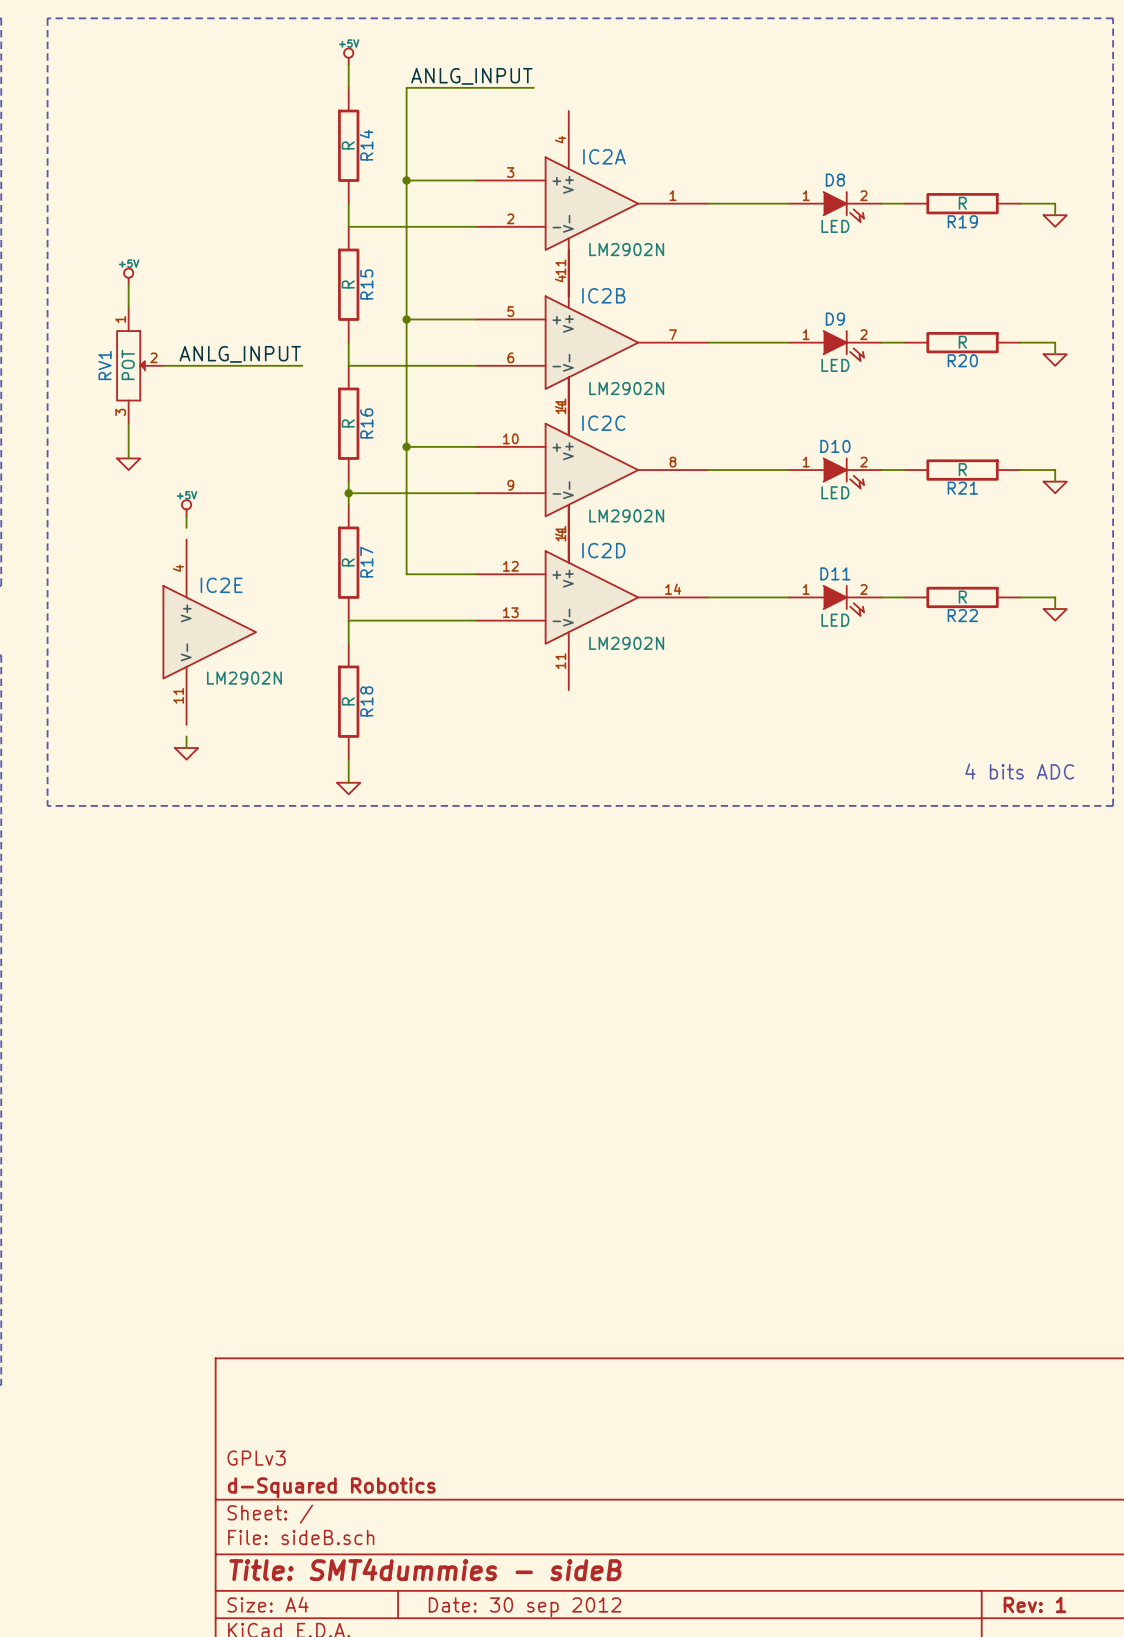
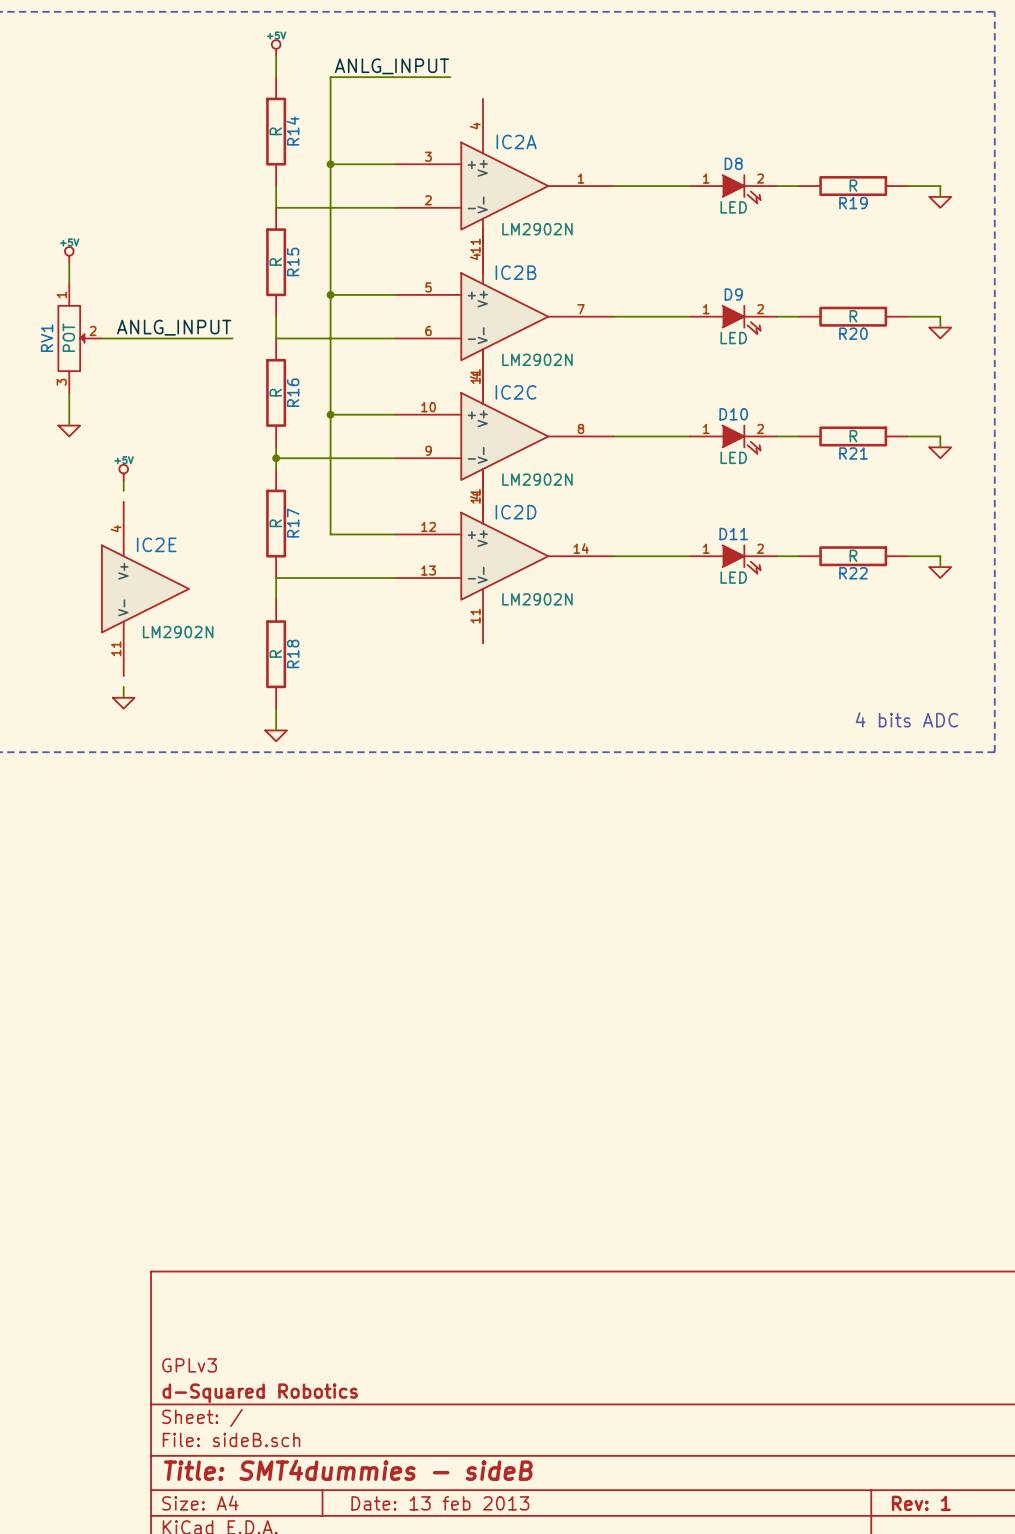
title block: Date: 30 sep 2012 (525, 1607) -> Date: 13 feb 2013 (440, 1503)

